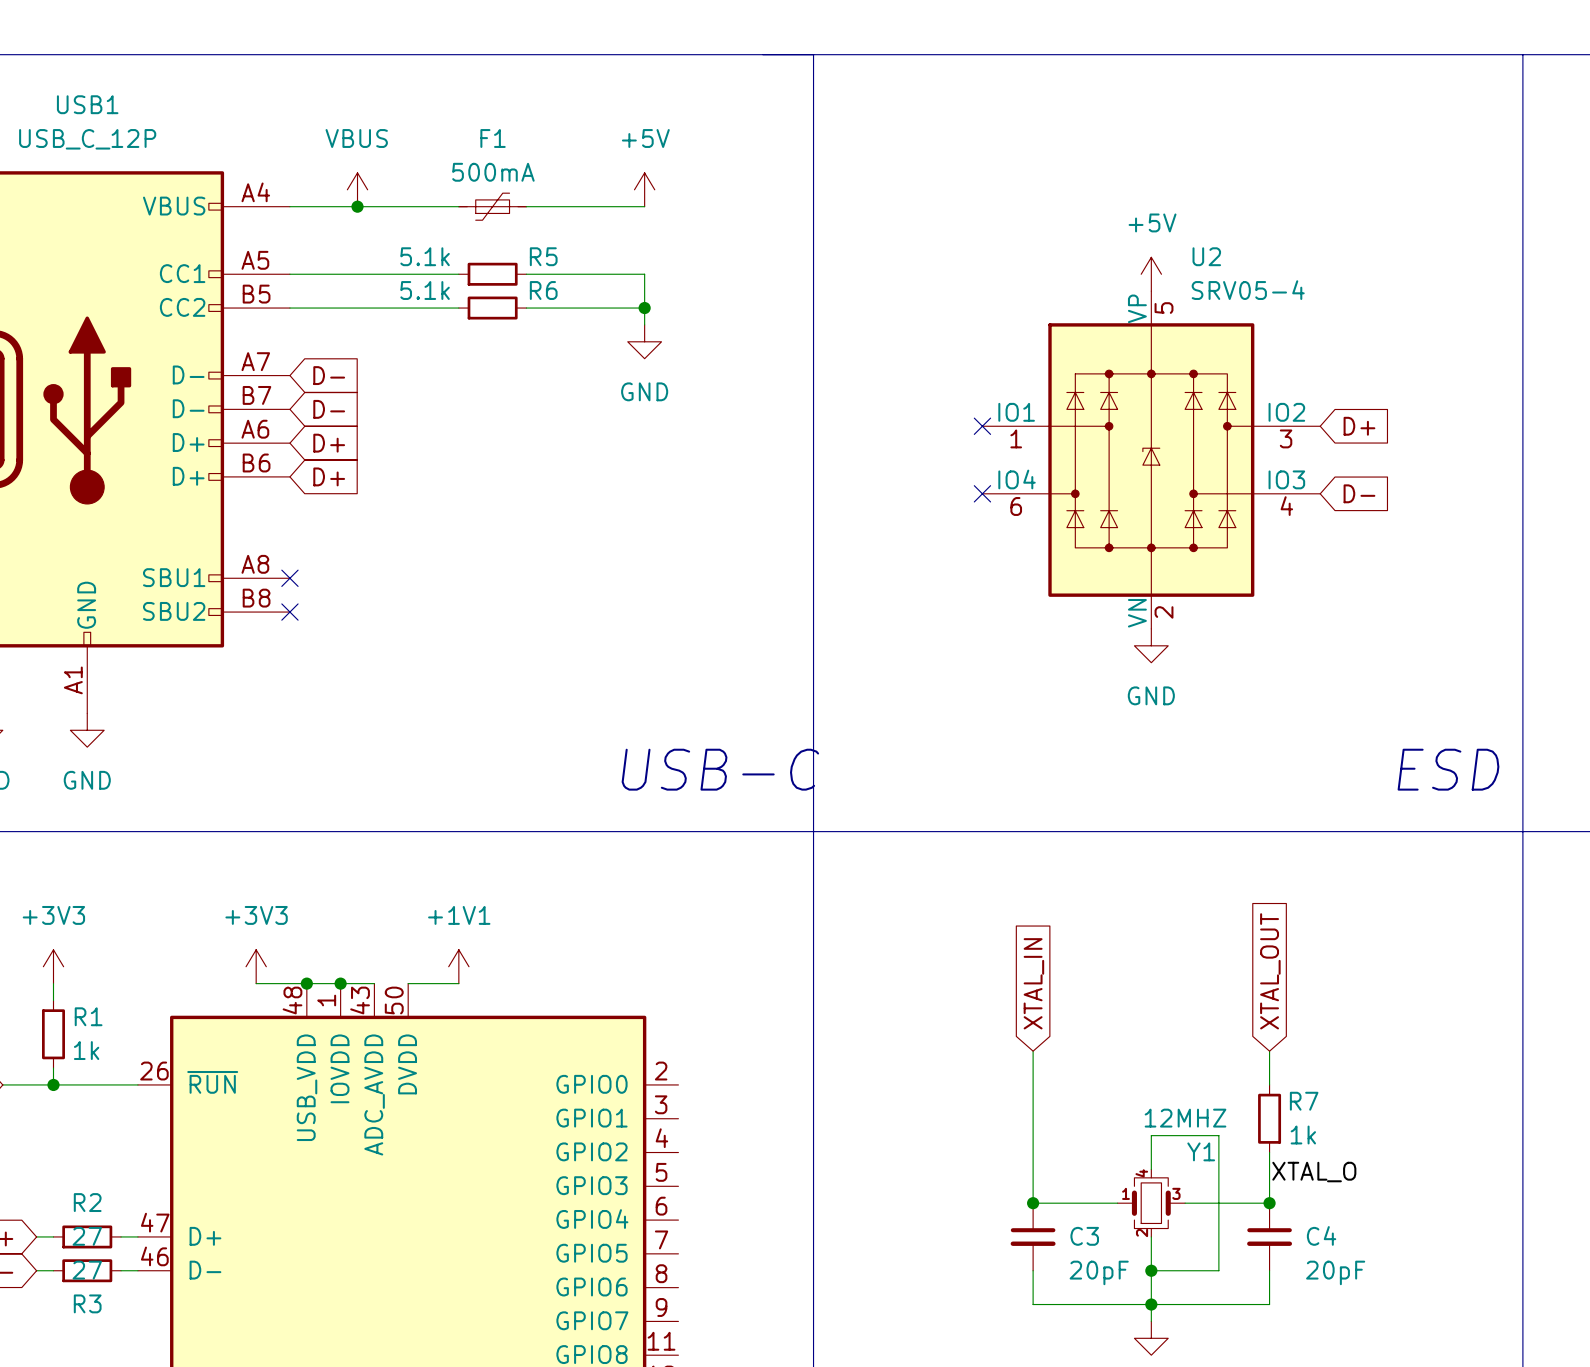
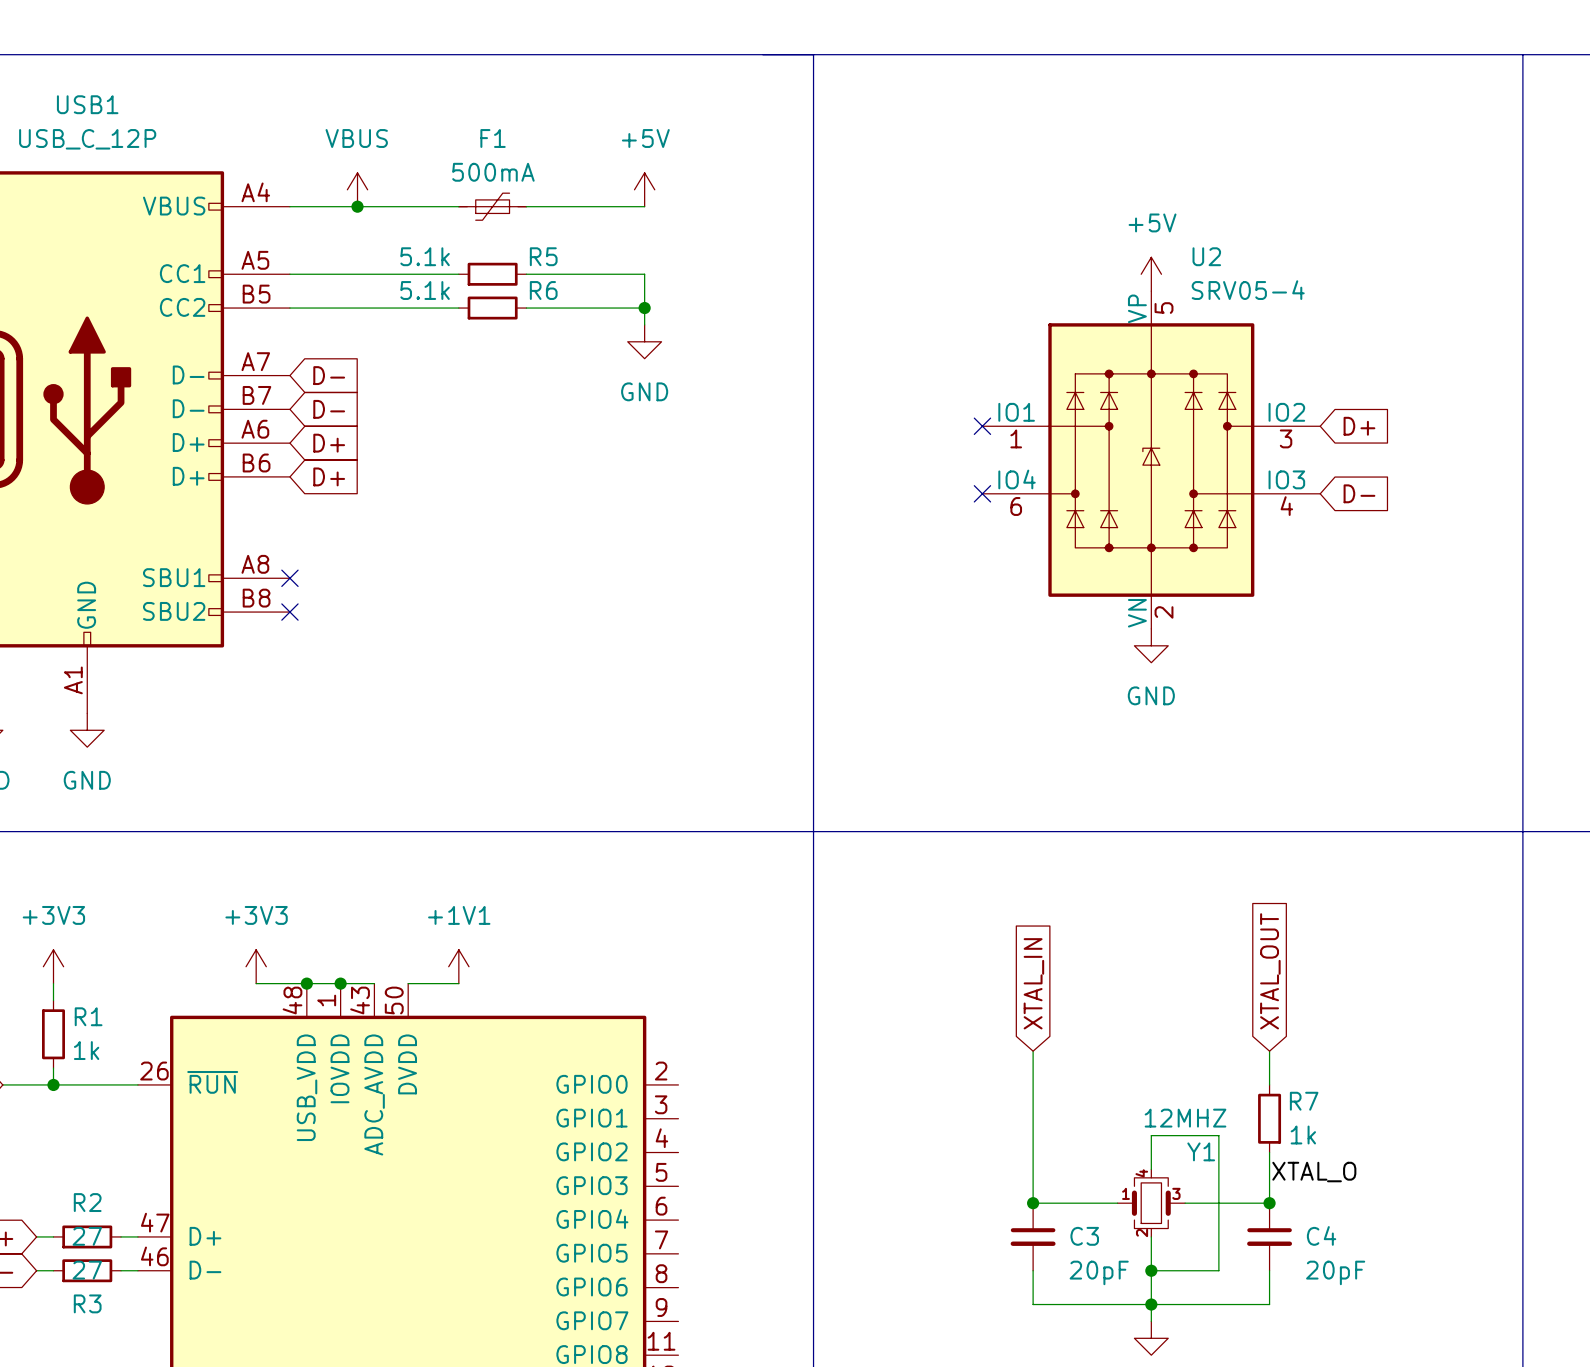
text: USB-C (720, 769) -> none
text: ESD (1448, 769) -> none

